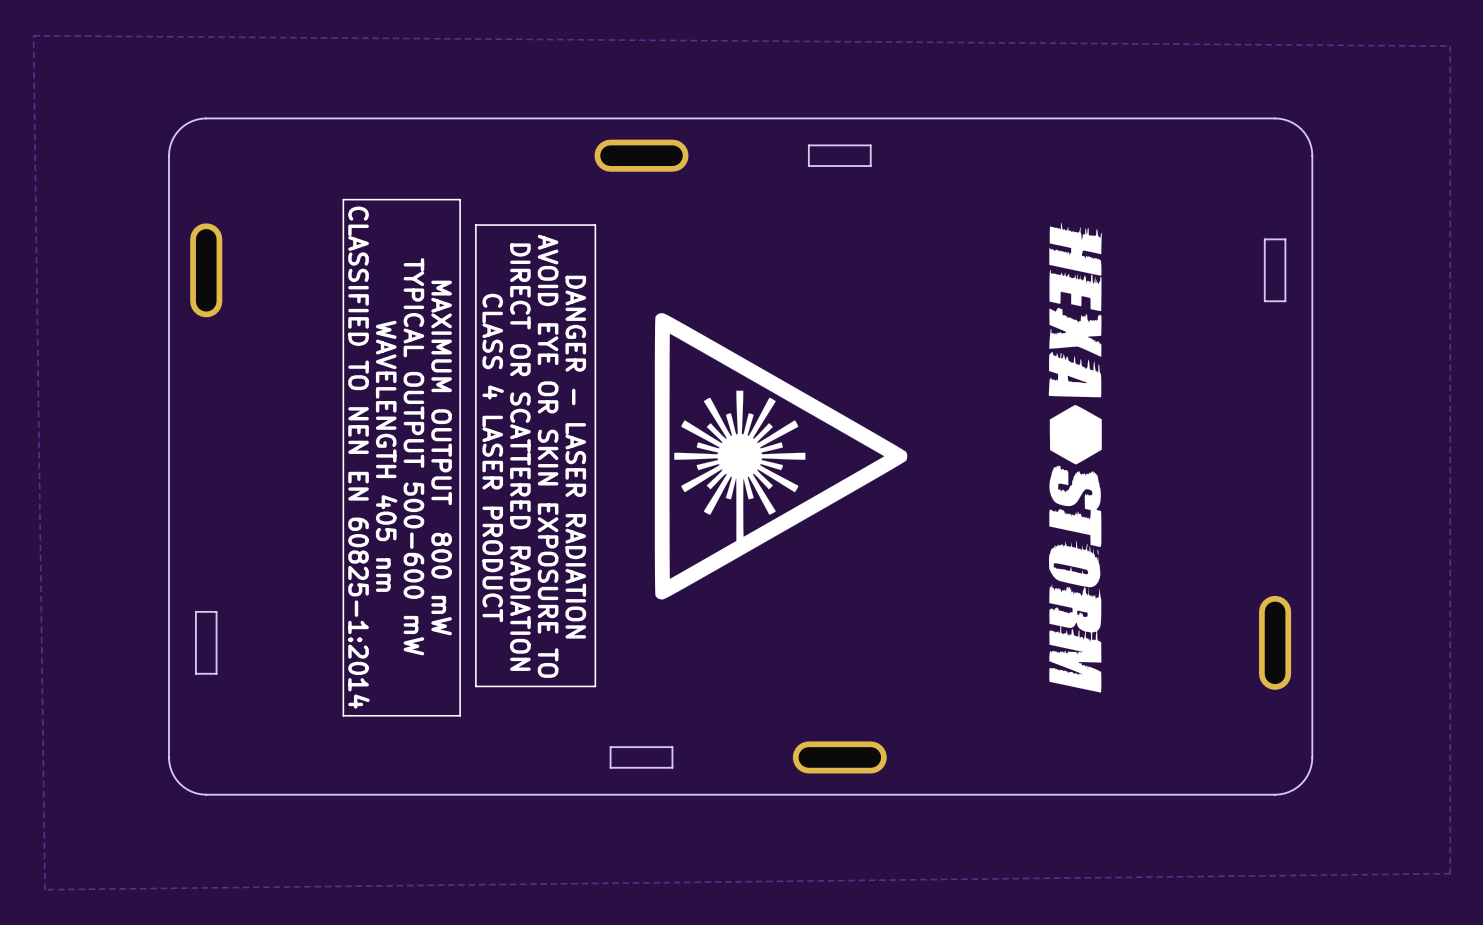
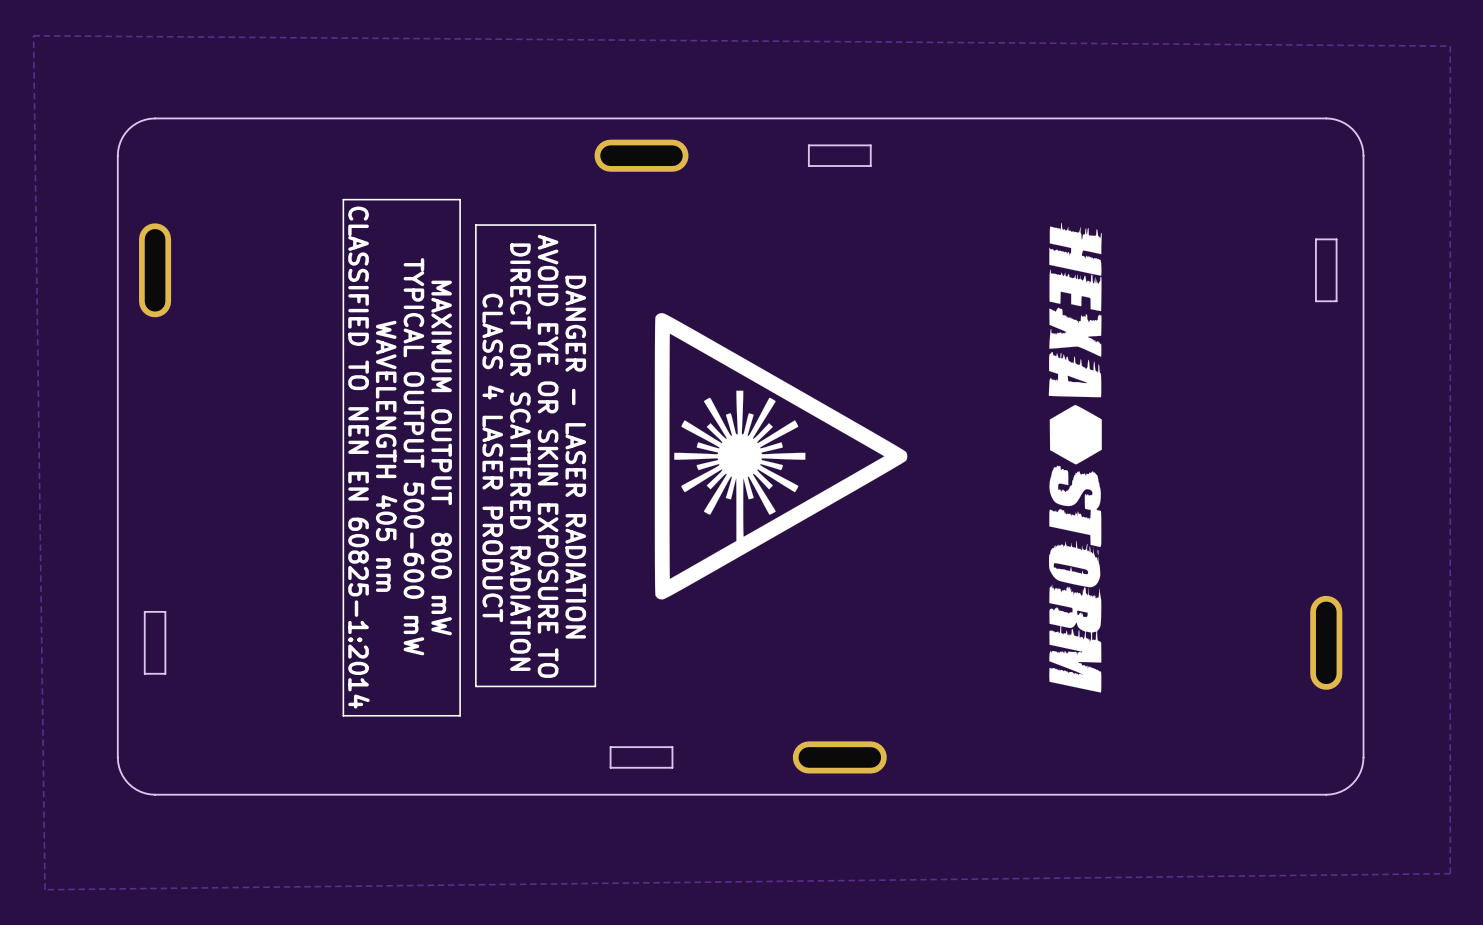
board edge: (206, 118) (191, 121) (179, 129) (171, 141) (168, 155) (168, 757) (171, 771) (179, 783) (191, 791) (206, 794) -> (206, 118) (155, 118) (140, 121) (132, 126) (122, 137) (117, 155) (118, 762) (125, 780) (140, 791) (155, 794) (206, 794)
board edge: (1275, 118) (1289, 121) (1301, 129) (1309, 141) (1312, 155) (1312, 757) (1309, 771) (1301, 783) (1289, 791) (1275, 794) -> (1275, 118) (1326, 118) (1340, 121) (1355, 133) (1360, 141) (1363, 155) (1363, 762) (1355, 780) (1340, 791) (1326, 794) (1275, 794)
board edge: (1264, 239) (1285, 239) (1285, 301) (1264, 301) (1264, 239) -> (1315, 239) (1336, 239) (1336, 301) (1315, 301) (1315, 239)
part position: (206, 270) -> (155, 270)
board edge: (195, 611) (195, 673) (216, 673) (216, 611) (195, 611) -> (144, 611) (144, 673) (165, 673) (165, 611) (144, 611)
part position: (1275, 642) -> (1326, 642)

